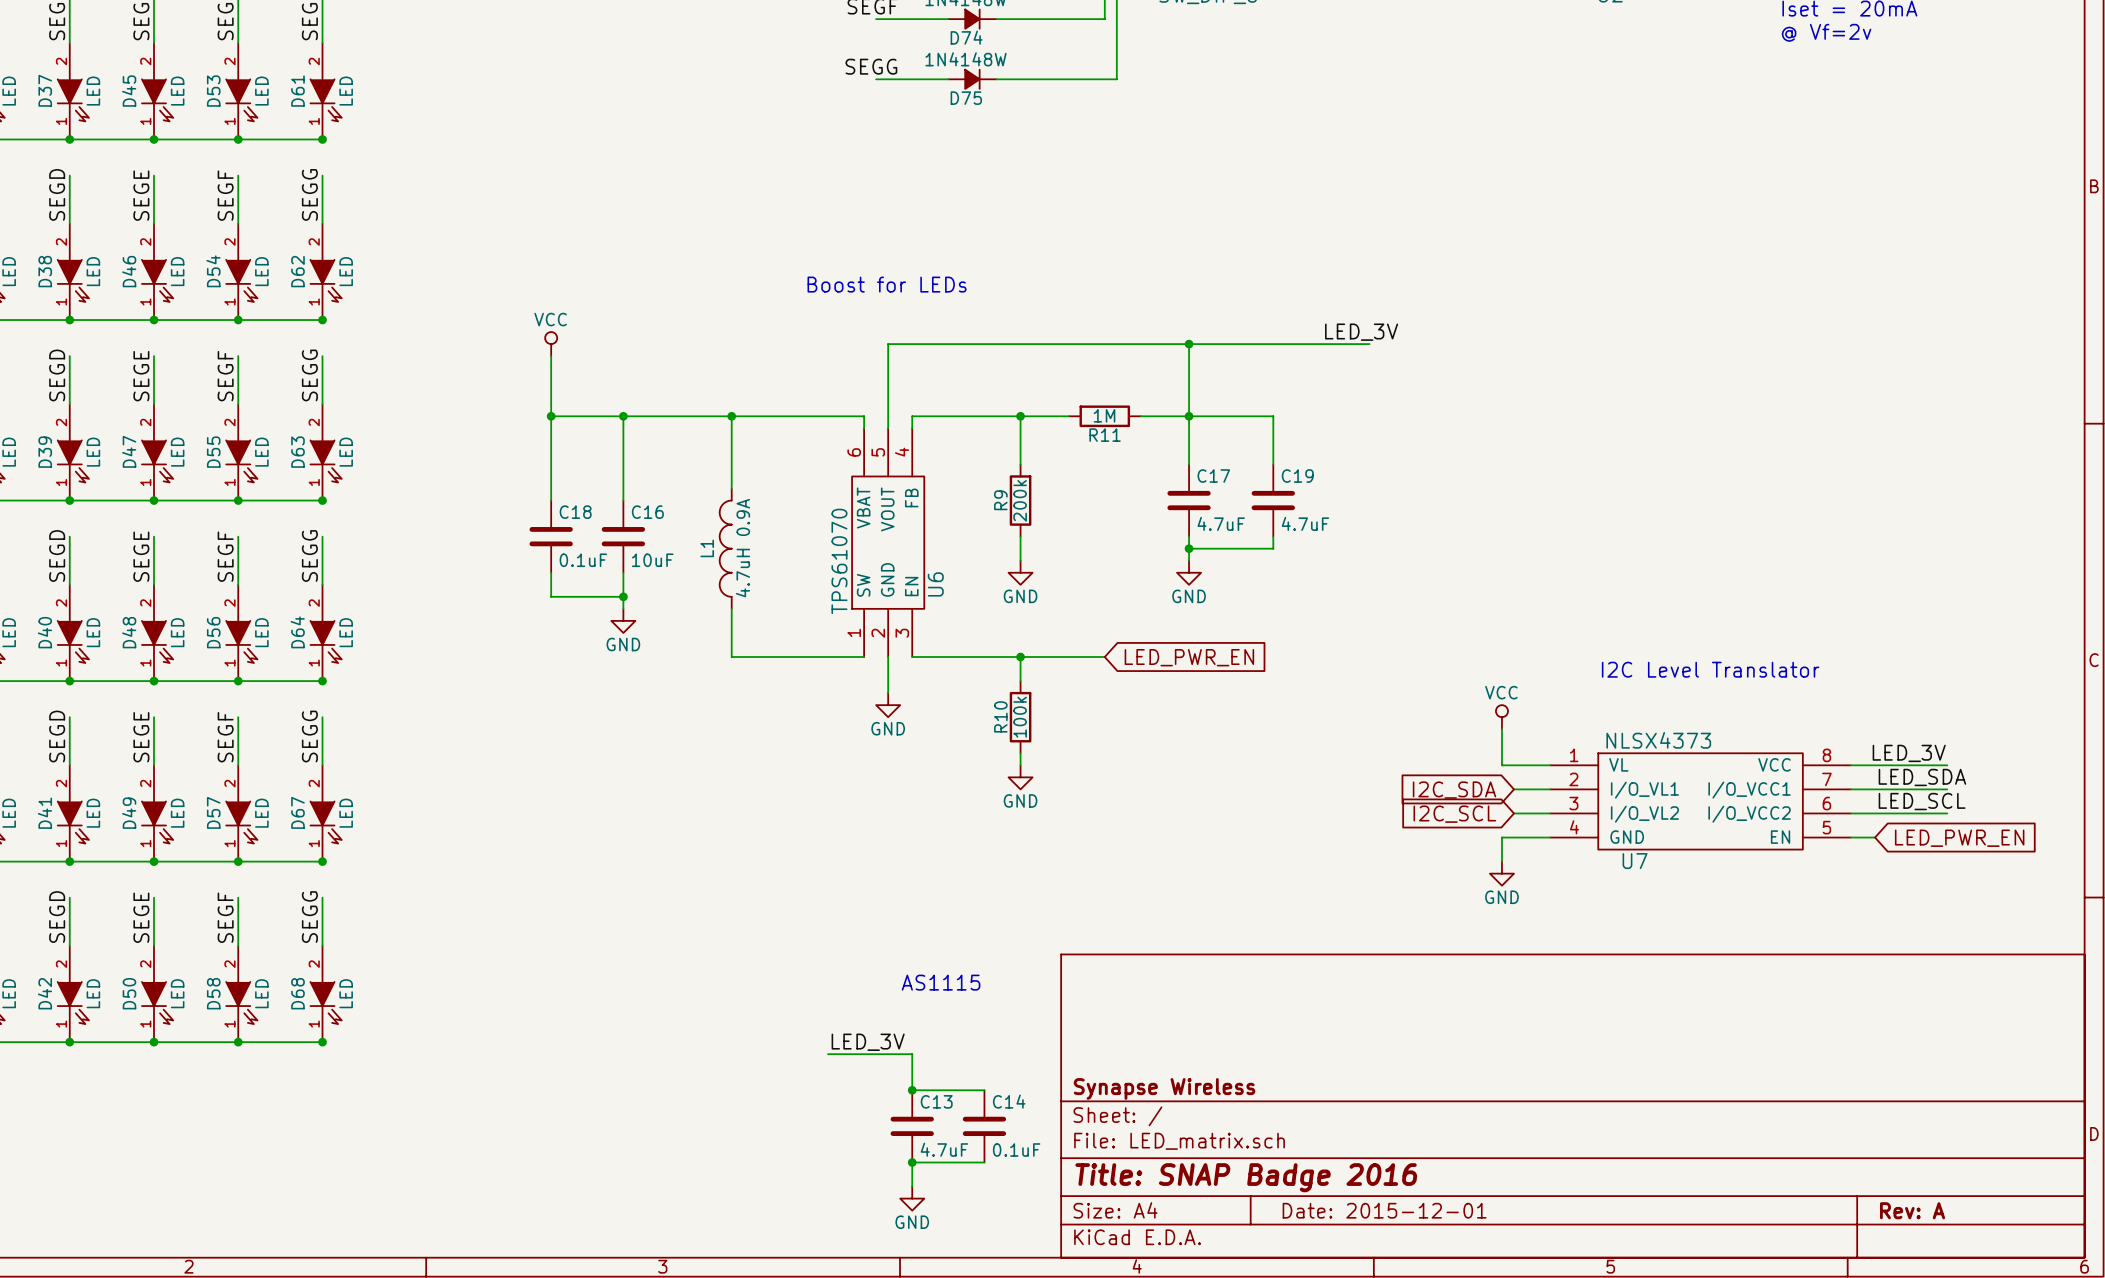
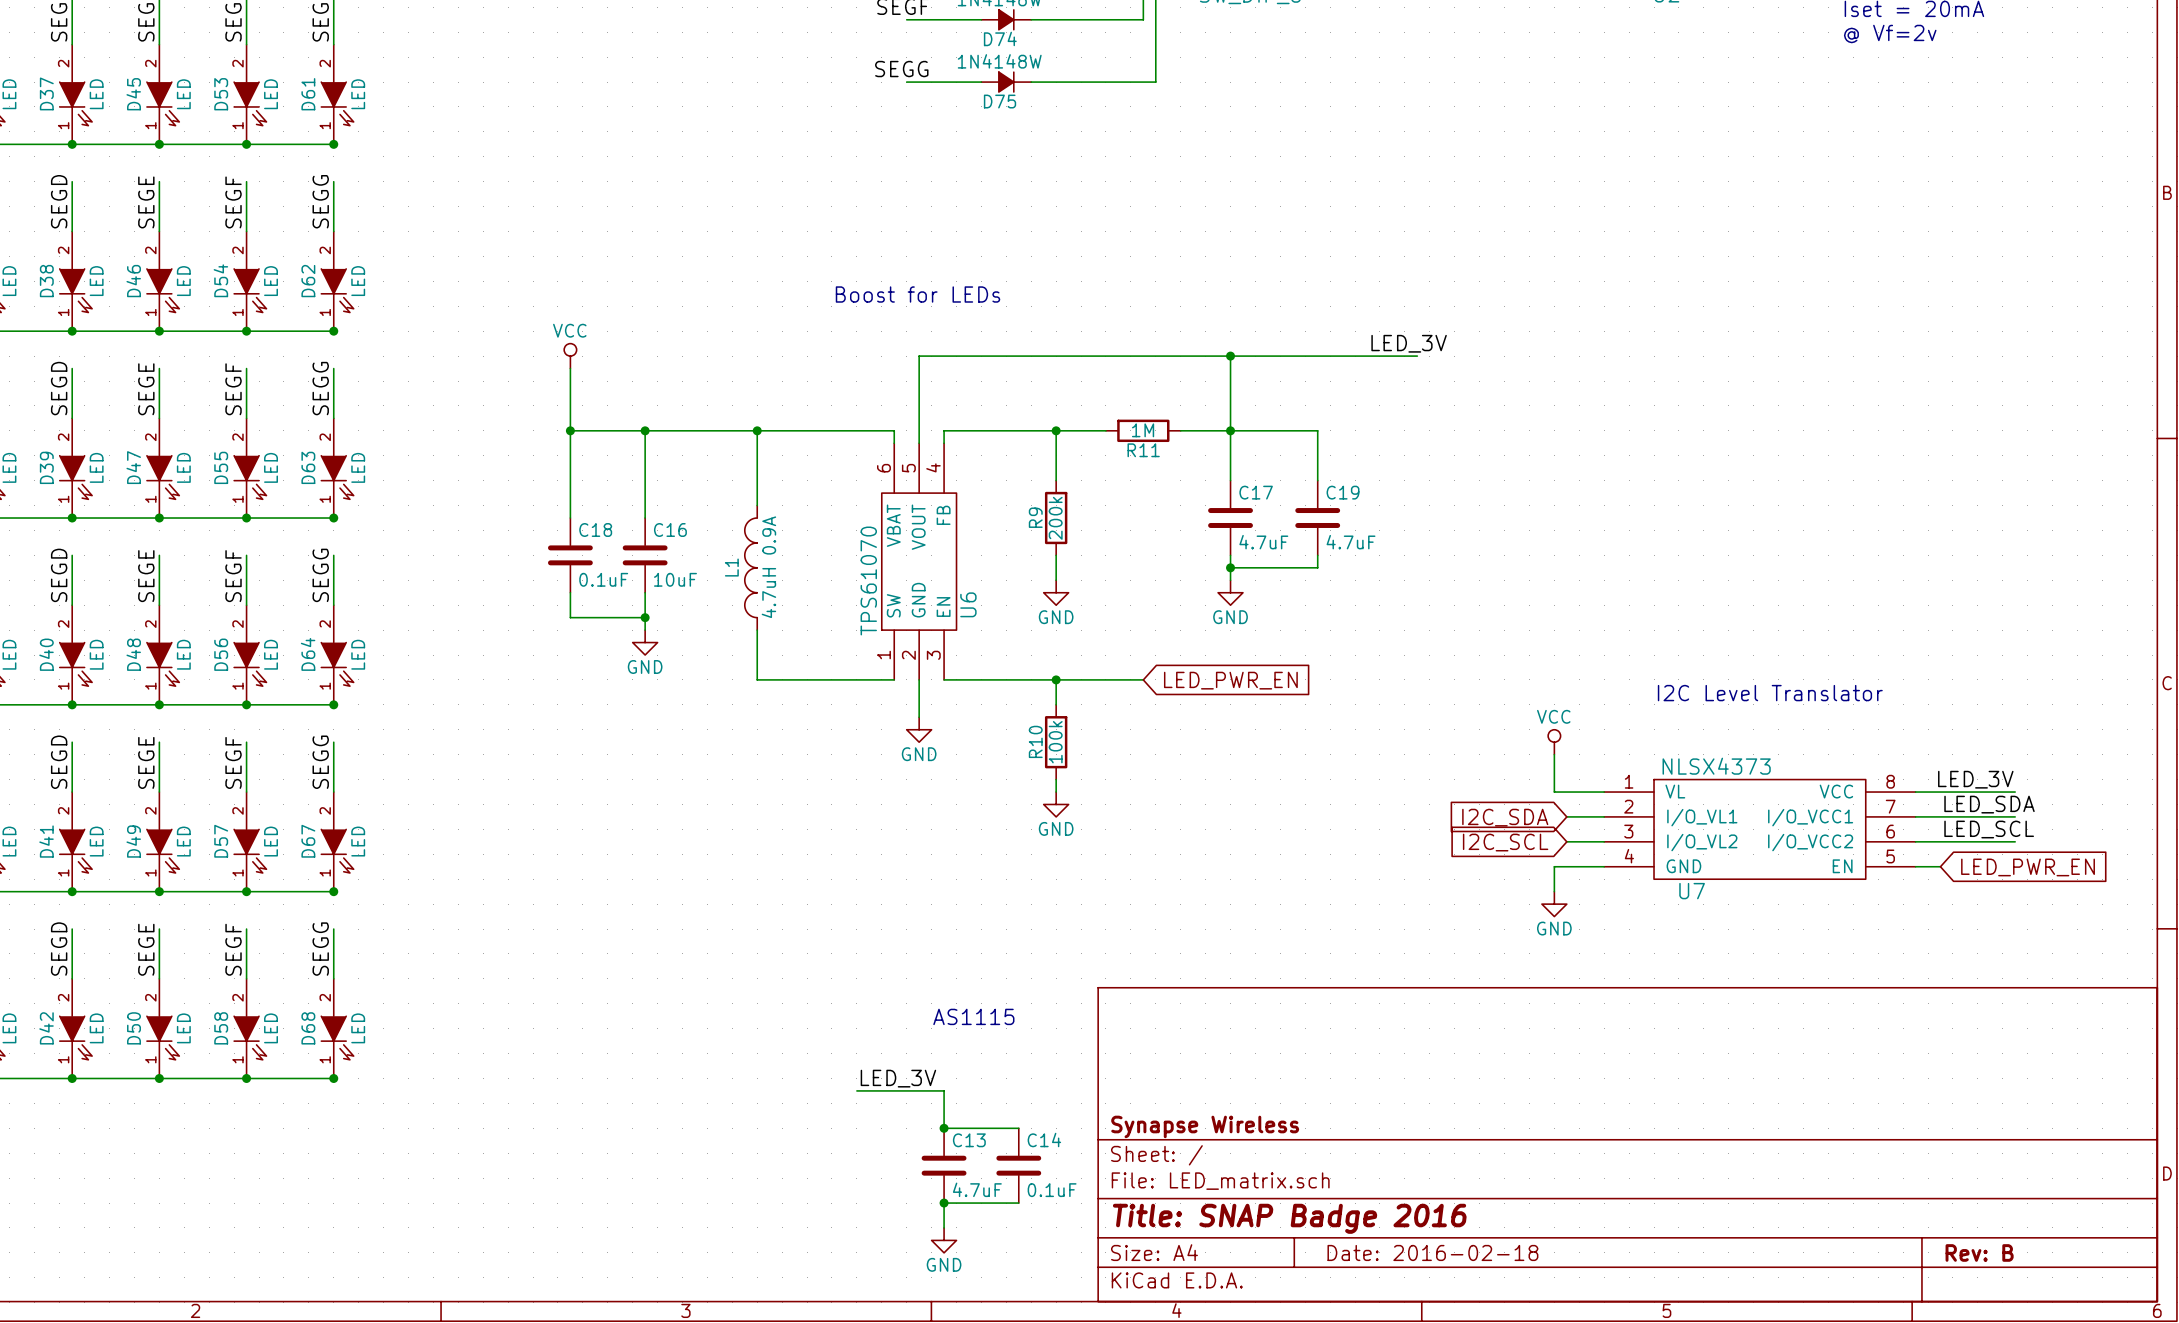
title block: Date: 2015-12-01 (1384, 1210) -> Date: 2016-02-18 (1432, 1252)
title block: Rev: A (1912, 1210) -> Rev: B (1979, 1252)

